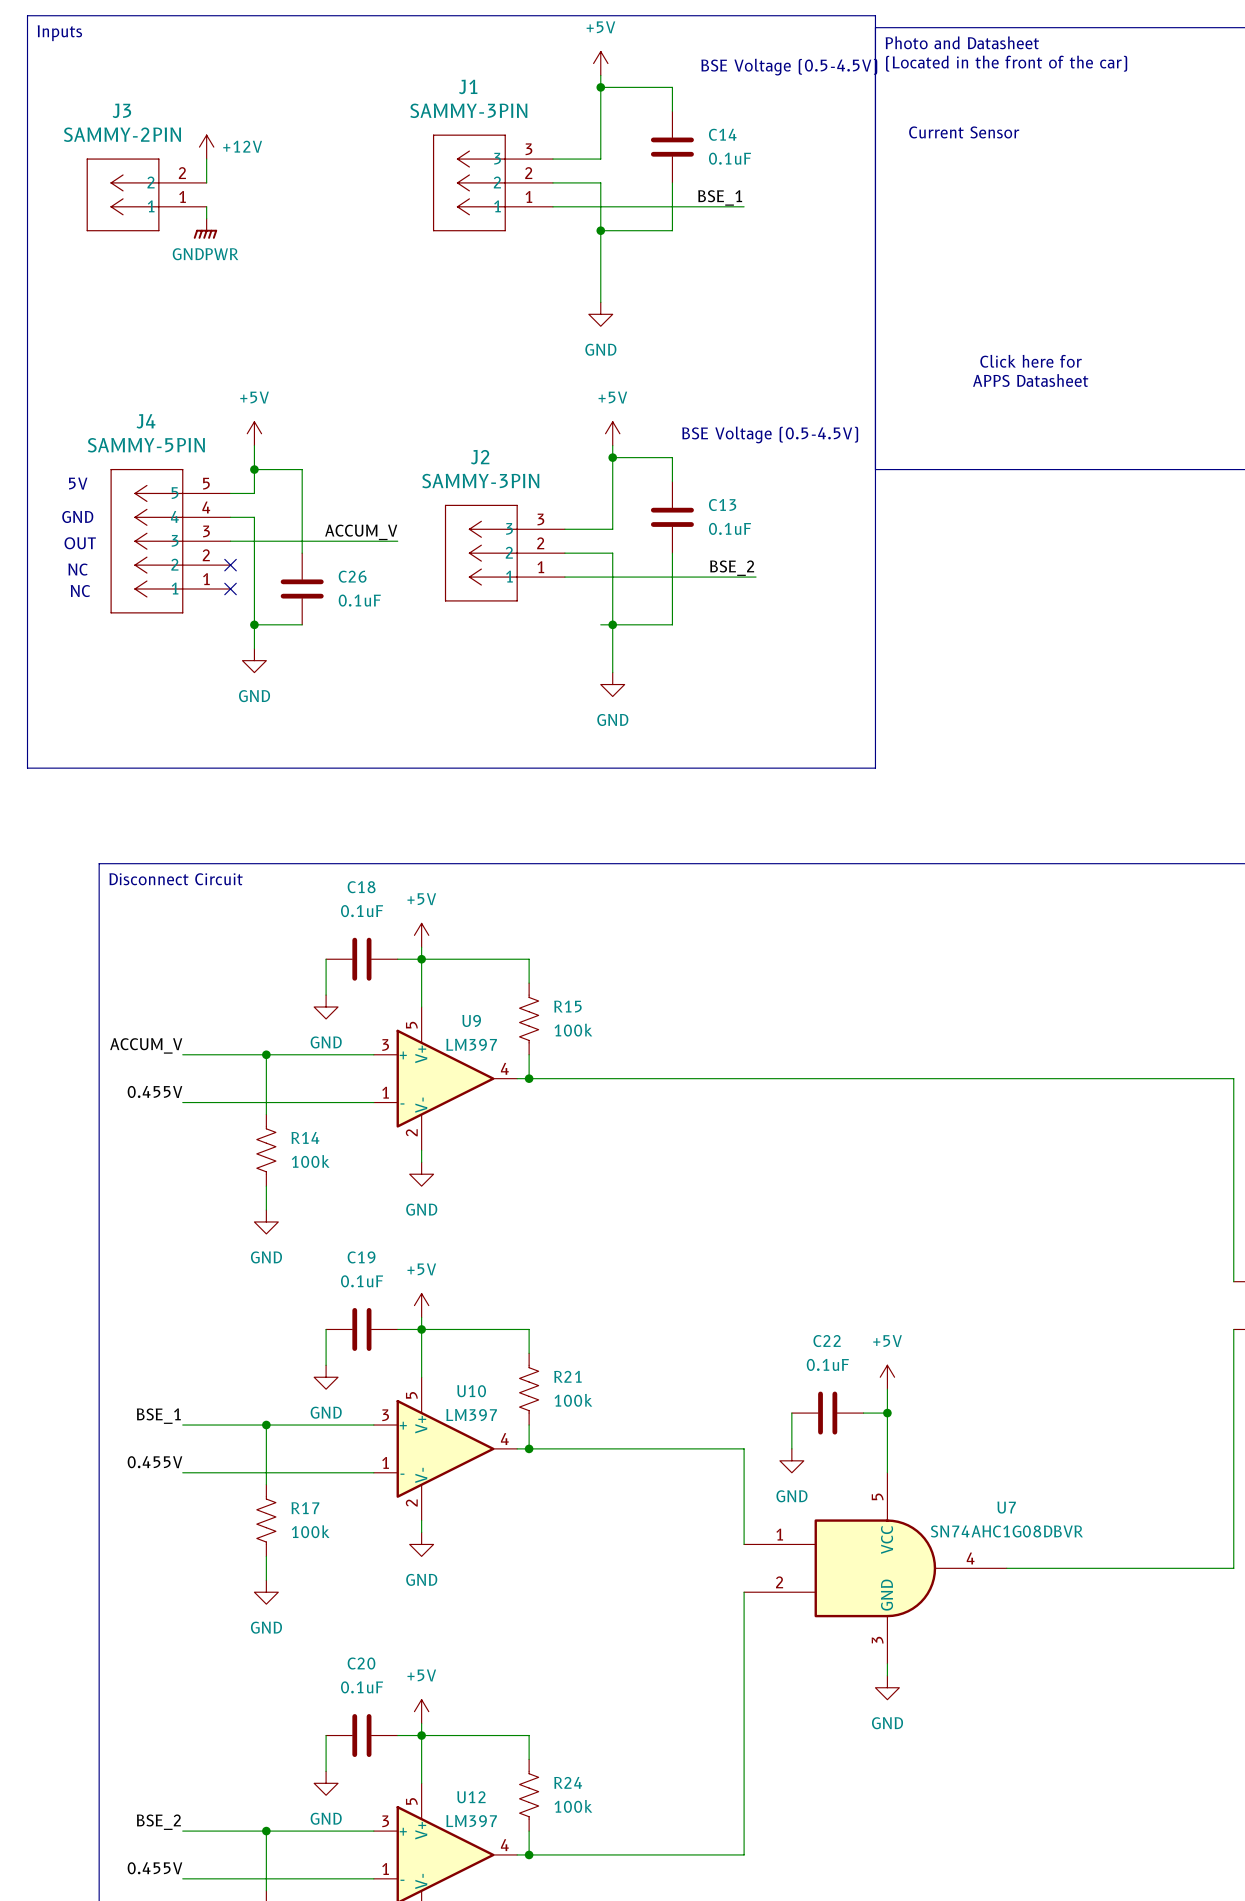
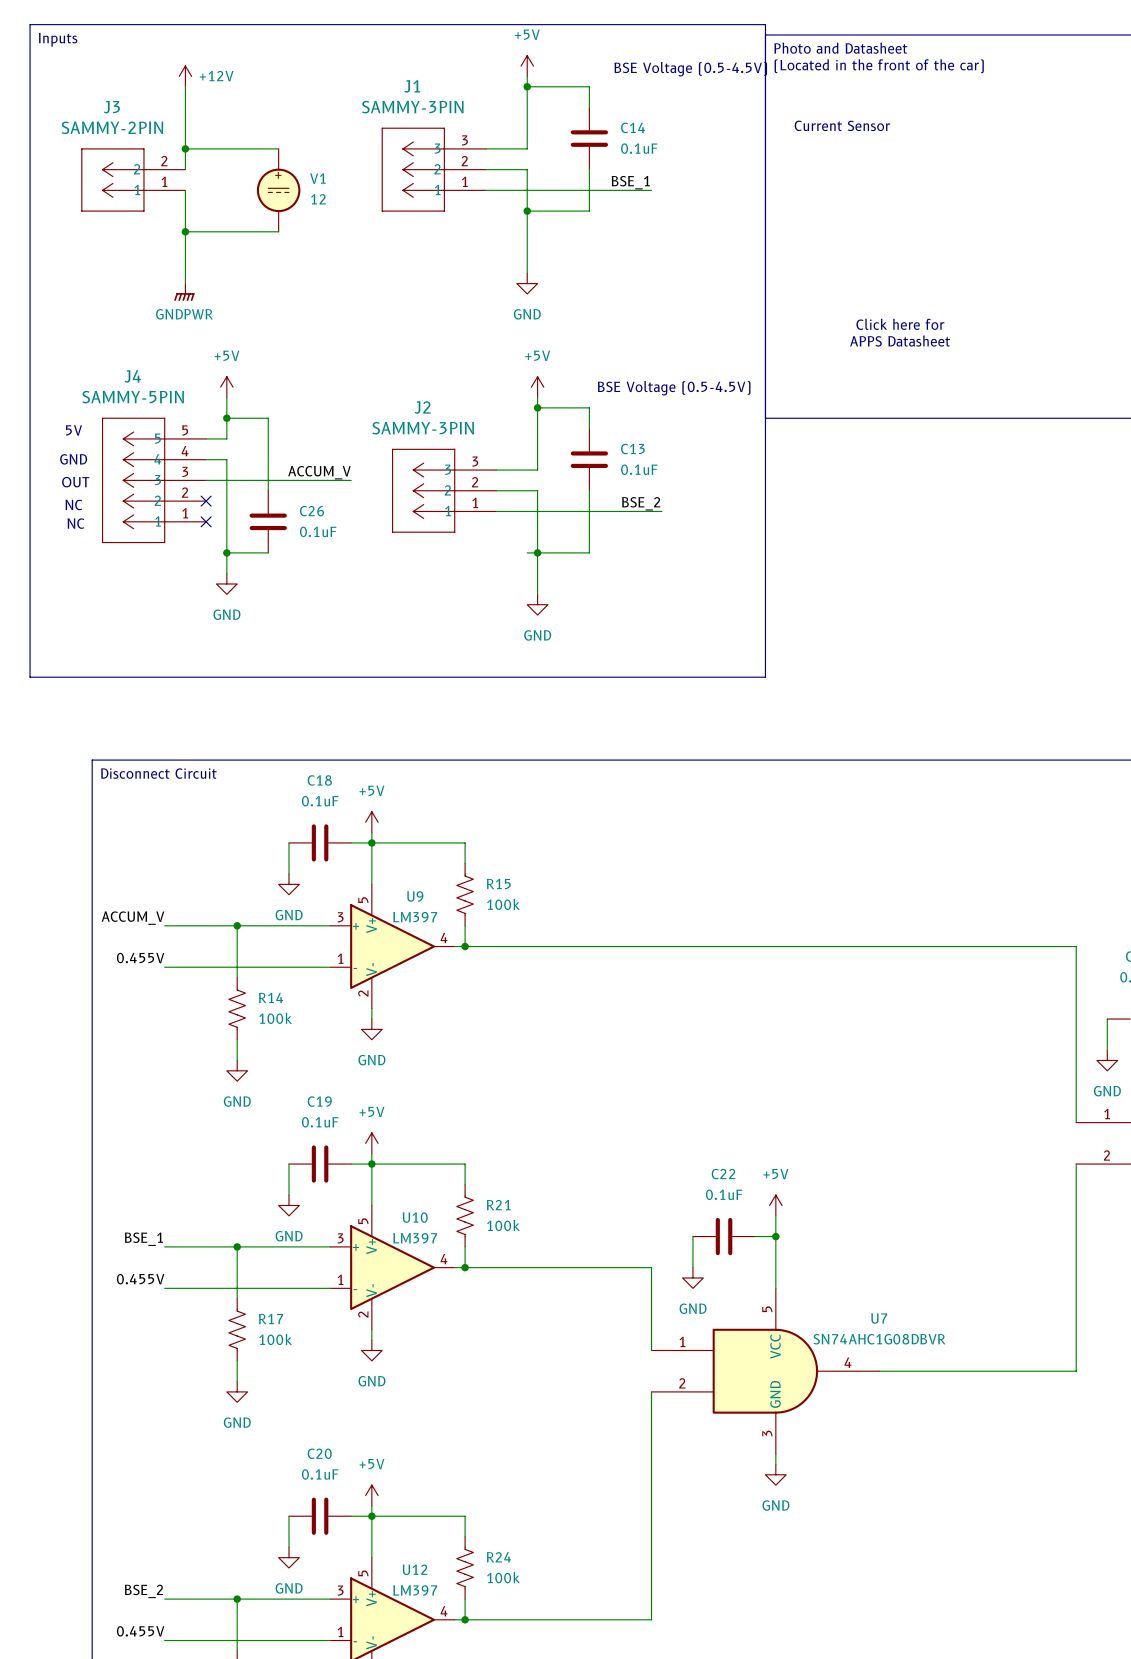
wire: none -> (185, 86) (185, 148) (278, 148)
power symbol position: +12V (206, 147) -> +12V (185, 76)
junction: none -> (185, 148)
V1: none -> 12 (278, 190)
wire: none -> (185, 200) (185, 283)
power symbol position: GNDPWR (205, 228) -> GNDPWR (184, 292)
wire: none -> (185, 231) (278, 231)
junction: none -> (185, 231)

